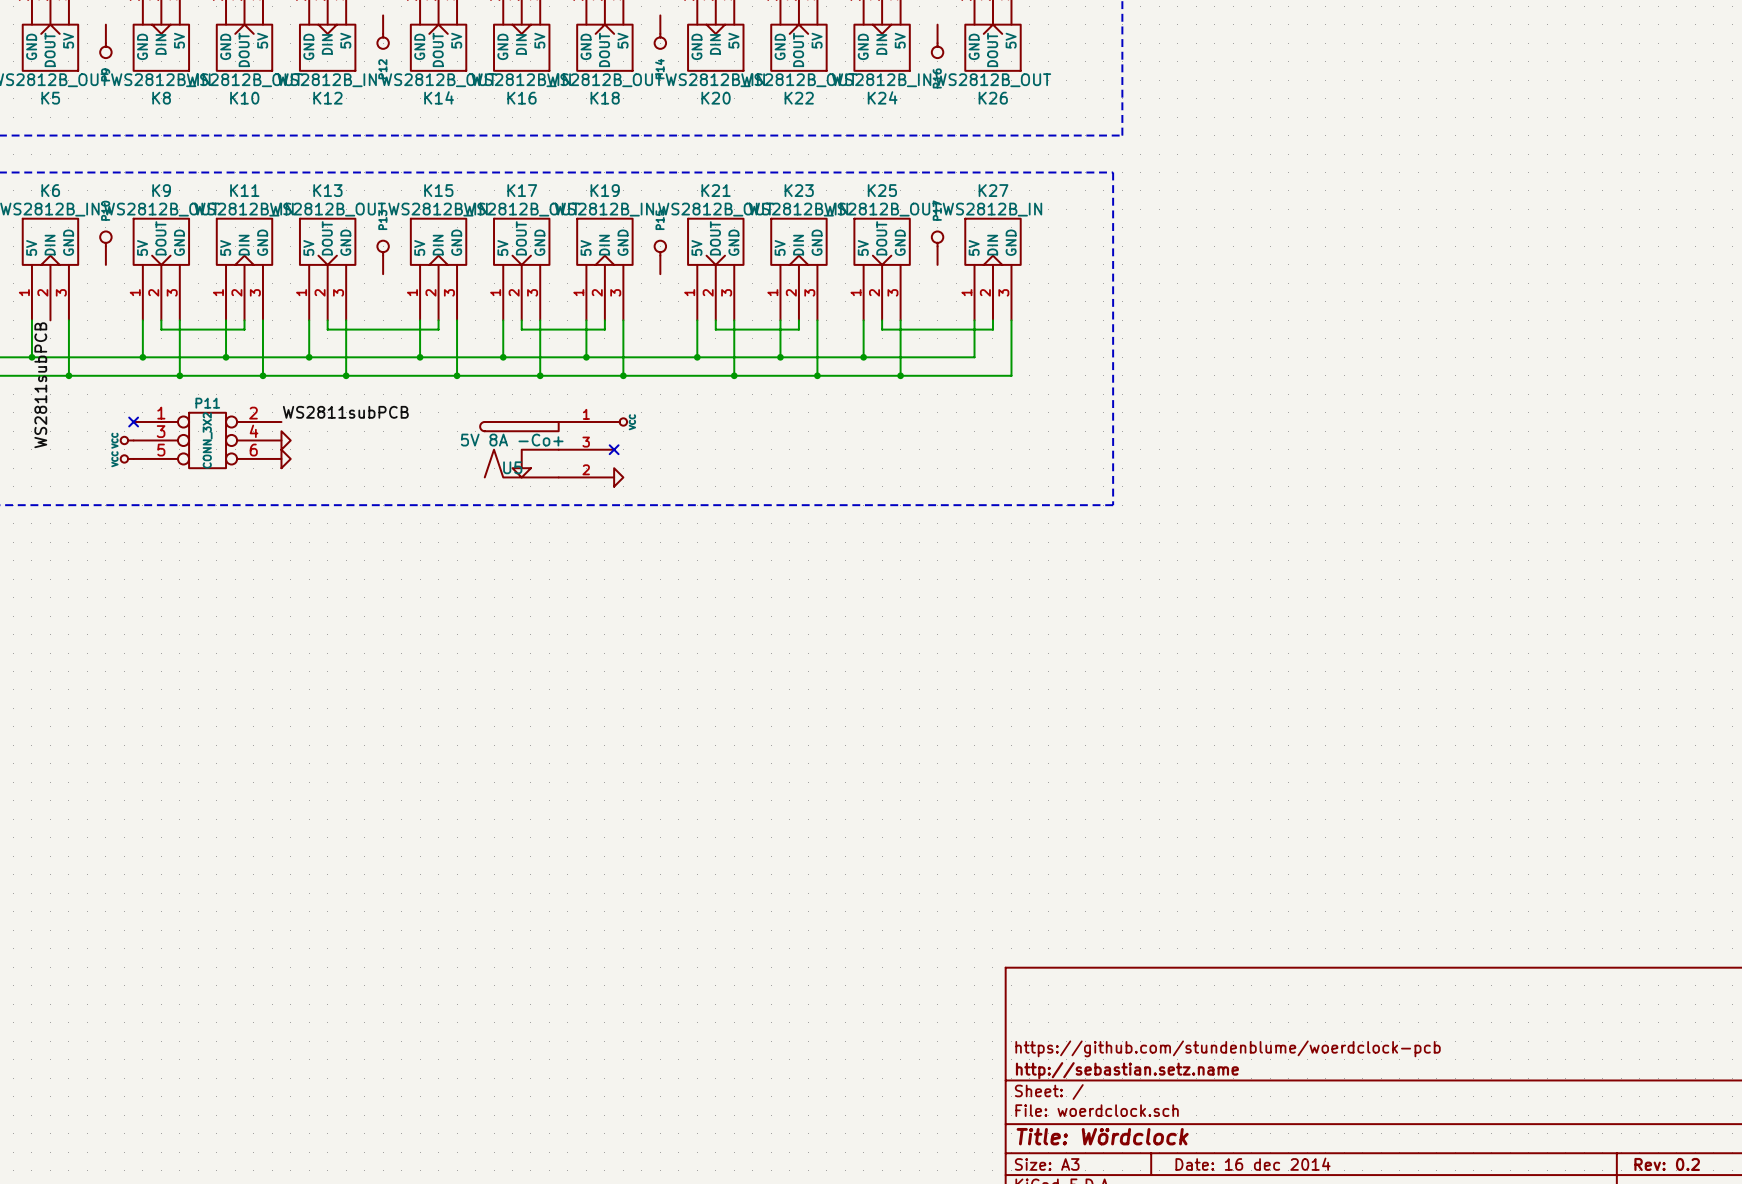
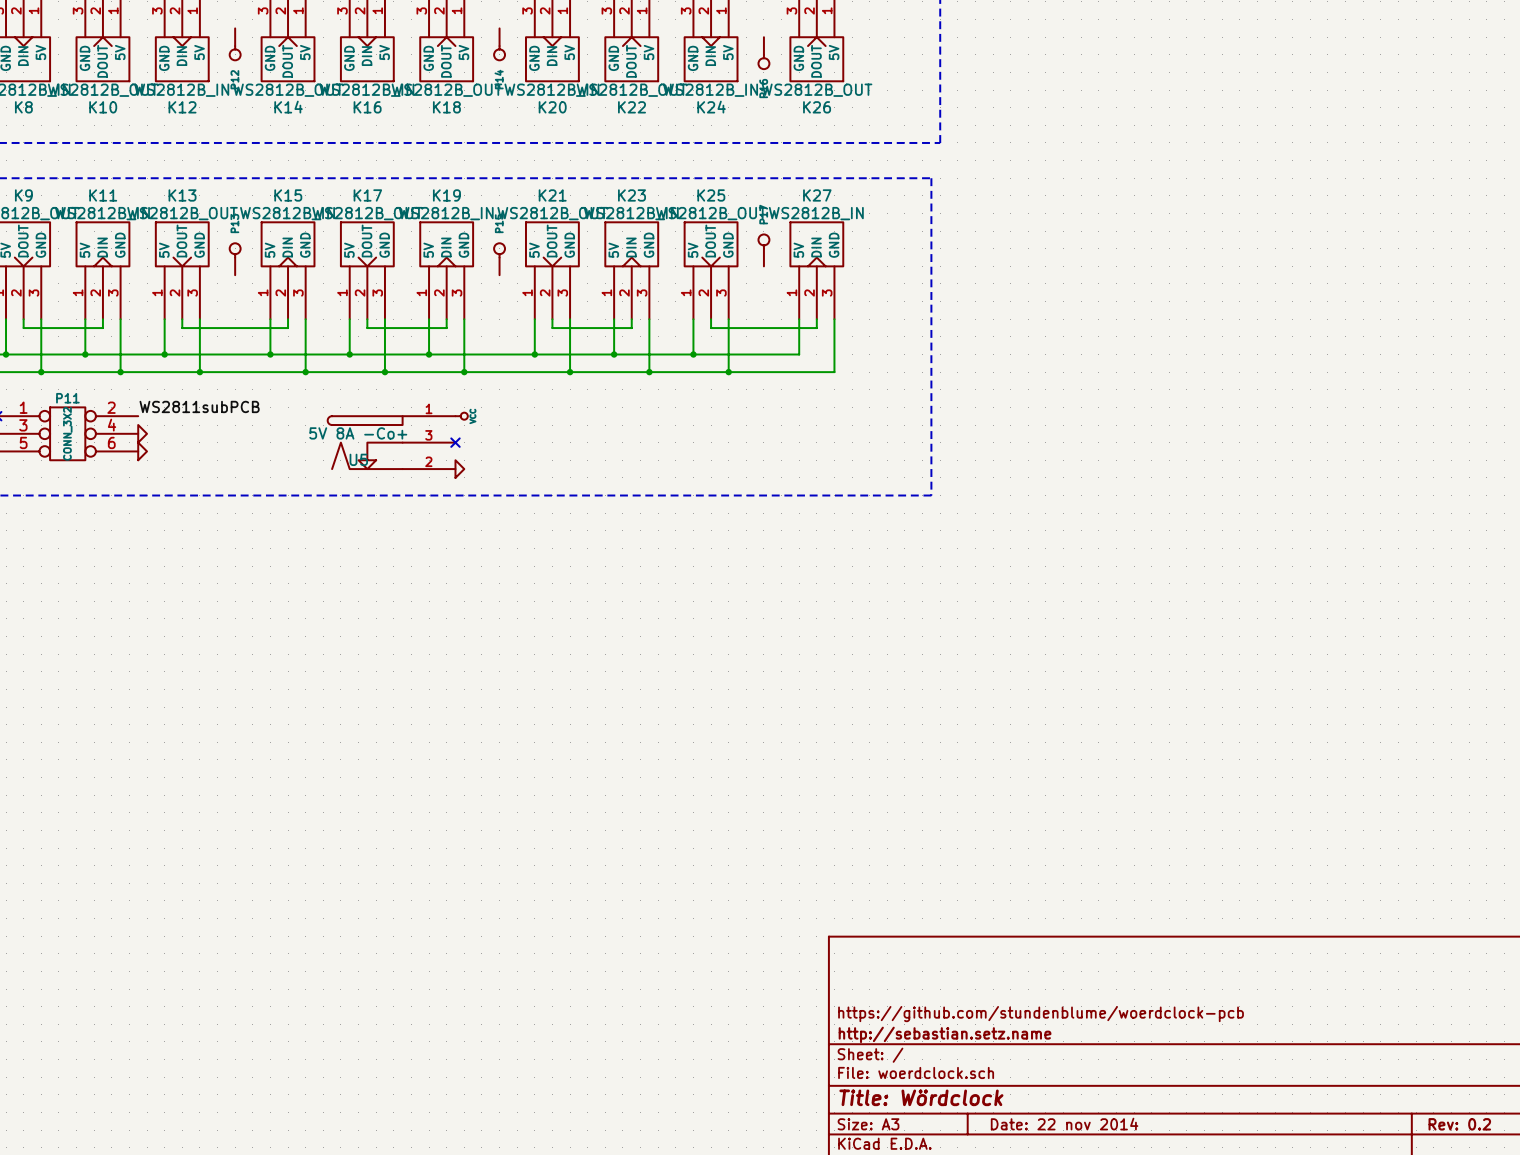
title block: Date: 16 dec 2014 (1253, 1164) -> Date: 22 nov 2014 (1064, 1124)

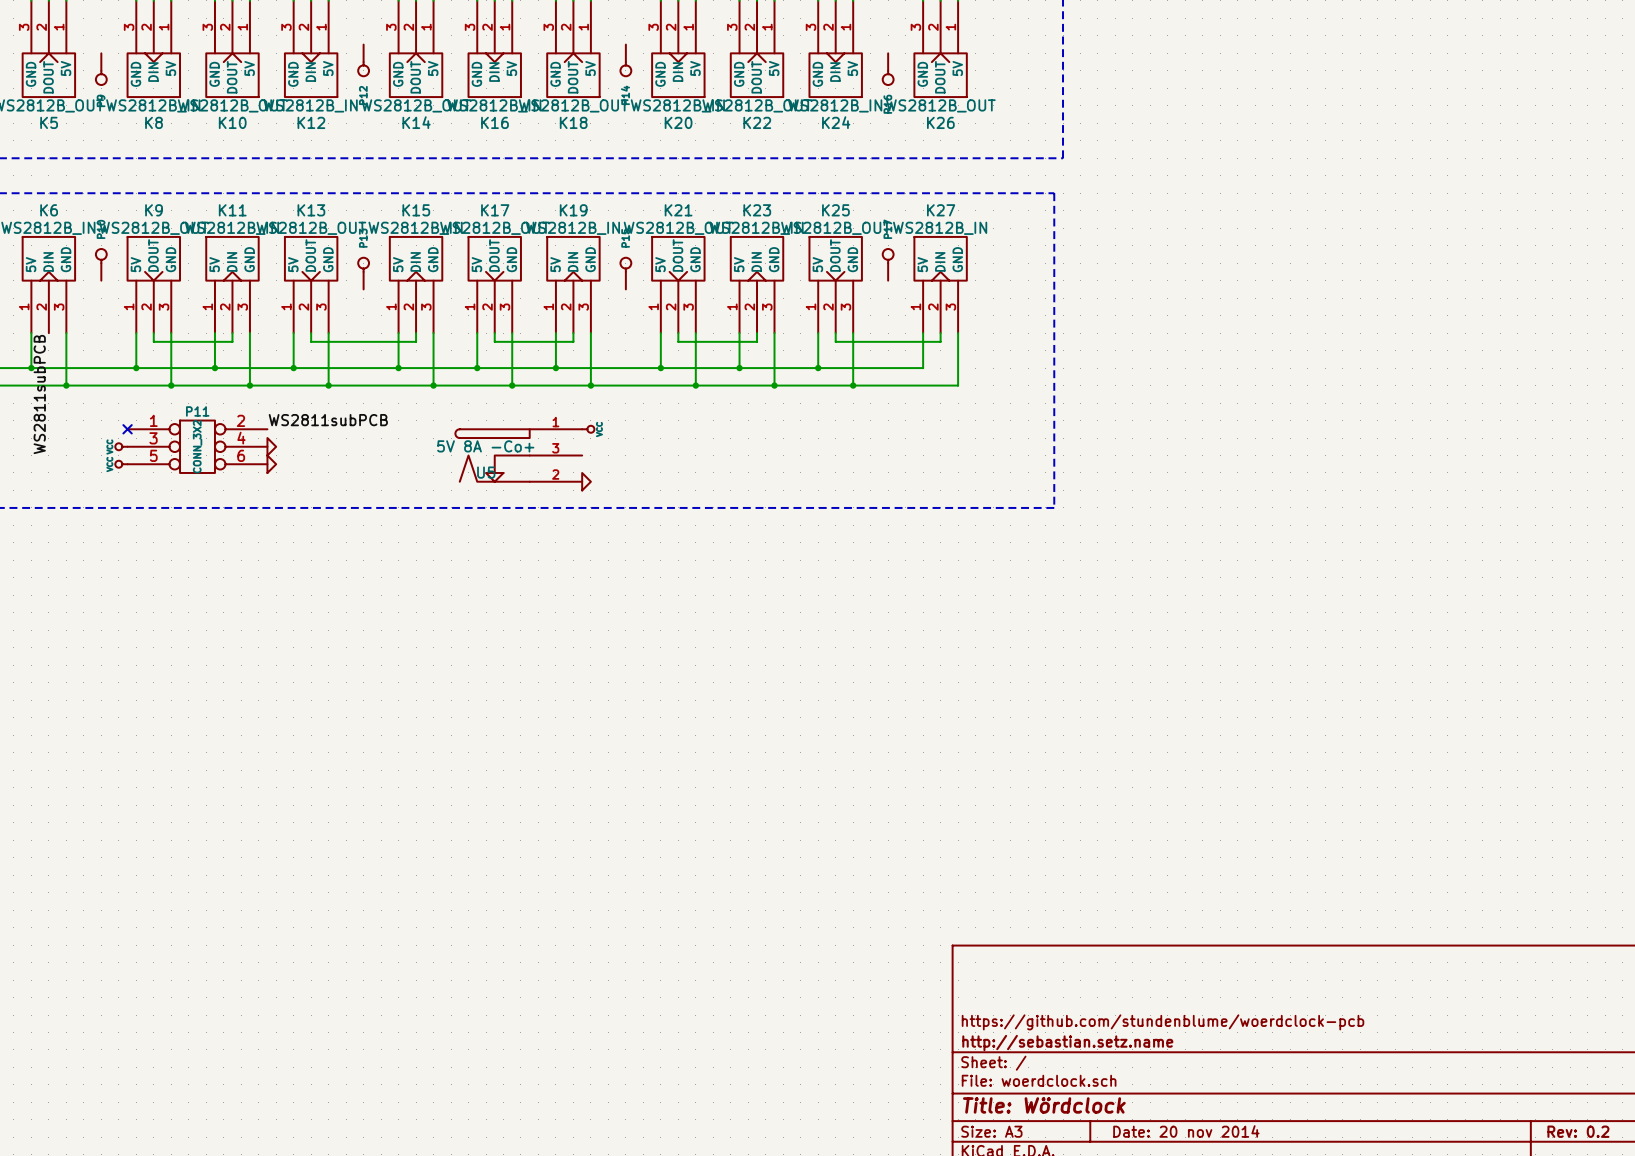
no-connect mark: (455, 442) -> none
title block: Date: 22 nov 2014 (1064, 1124) -> Date: 20 nov 2014 (1186, 1131)

